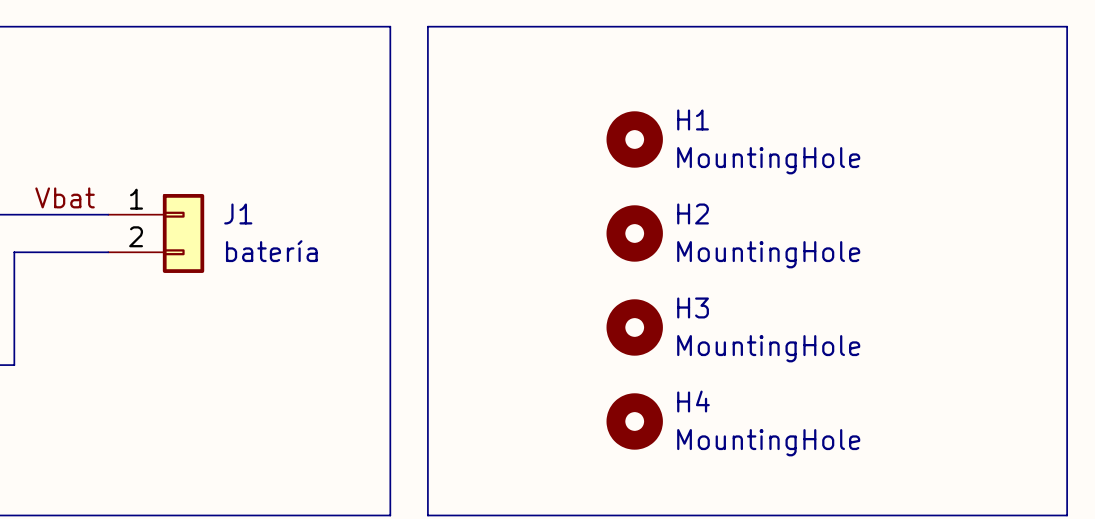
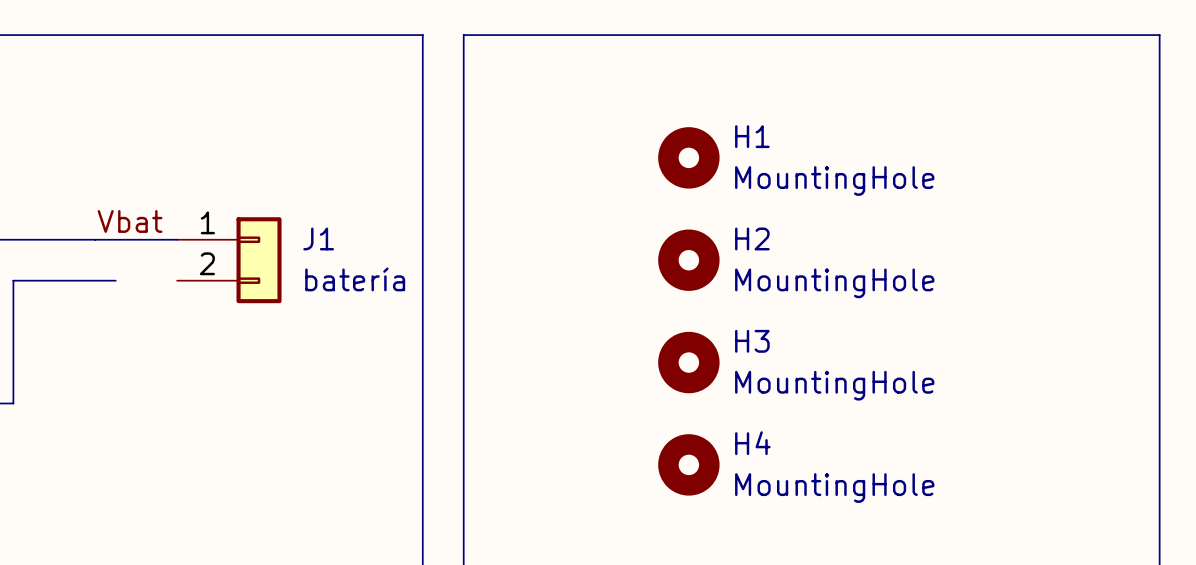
label position: Vbat (65, 197) -> Vbat (130, 221)
J1 position: (156, 233) -> (229, 260)

